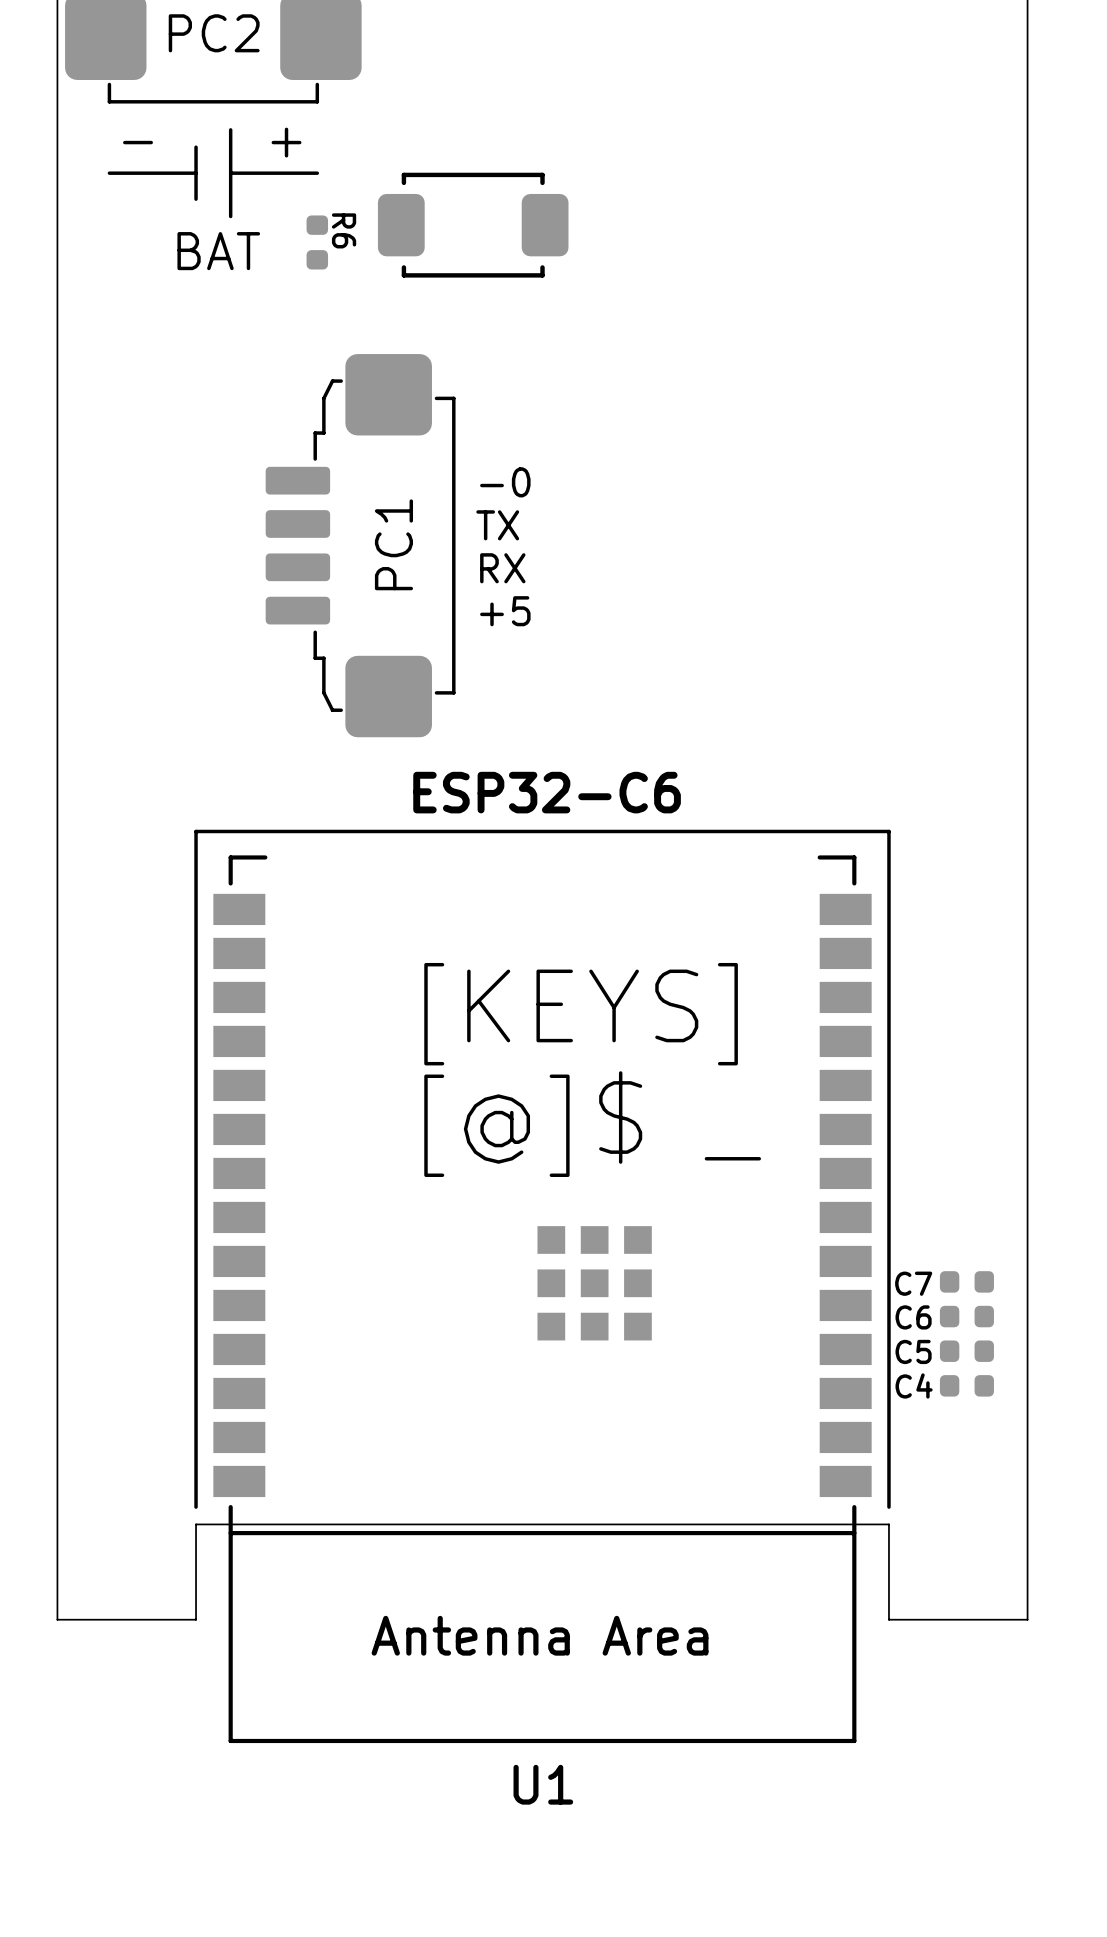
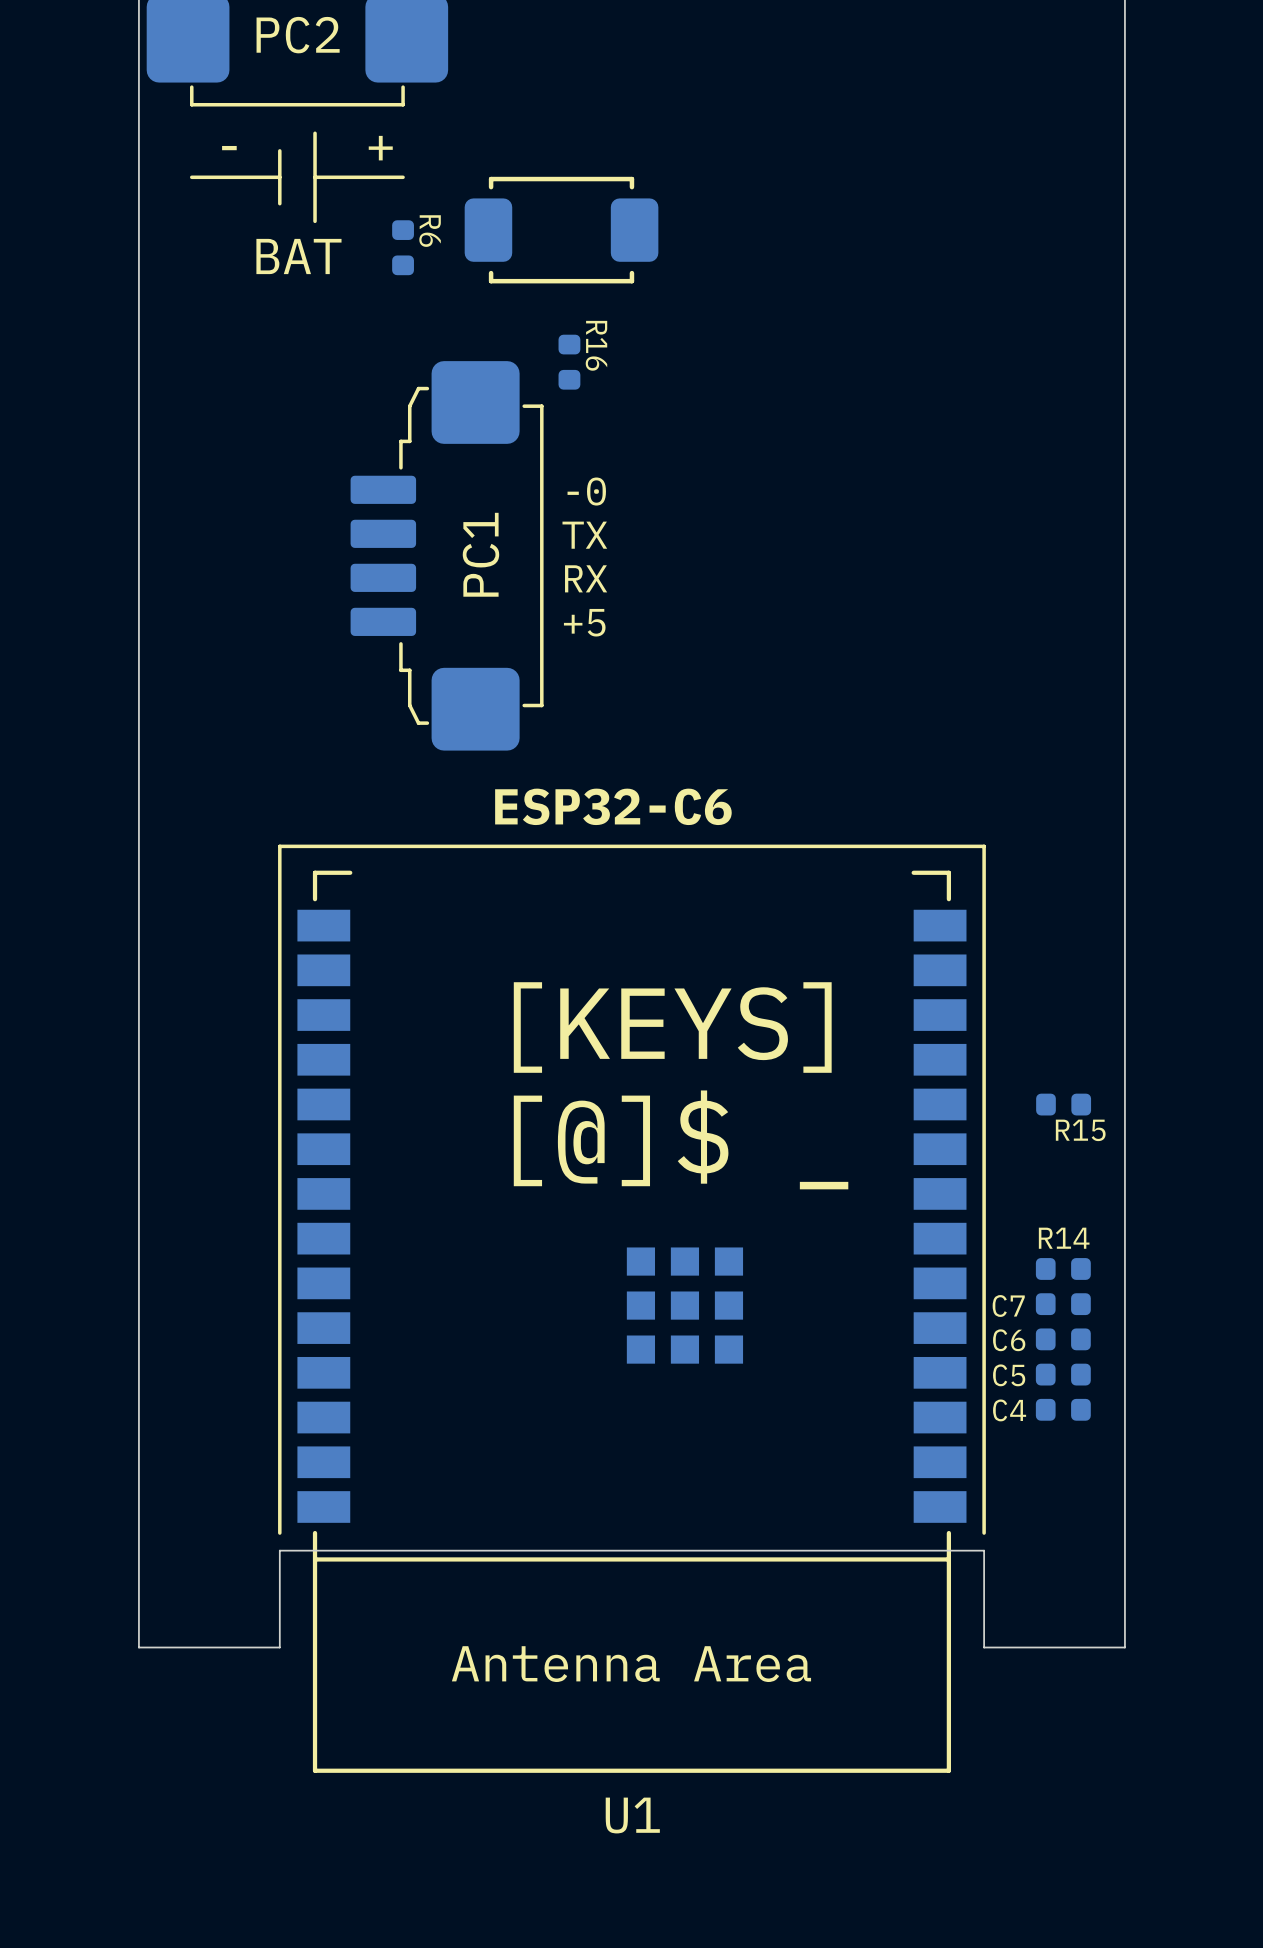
R16: none -> (569, 362)
R15: none -> (1063, 1104)
R14: none -> (1063, 1268)

